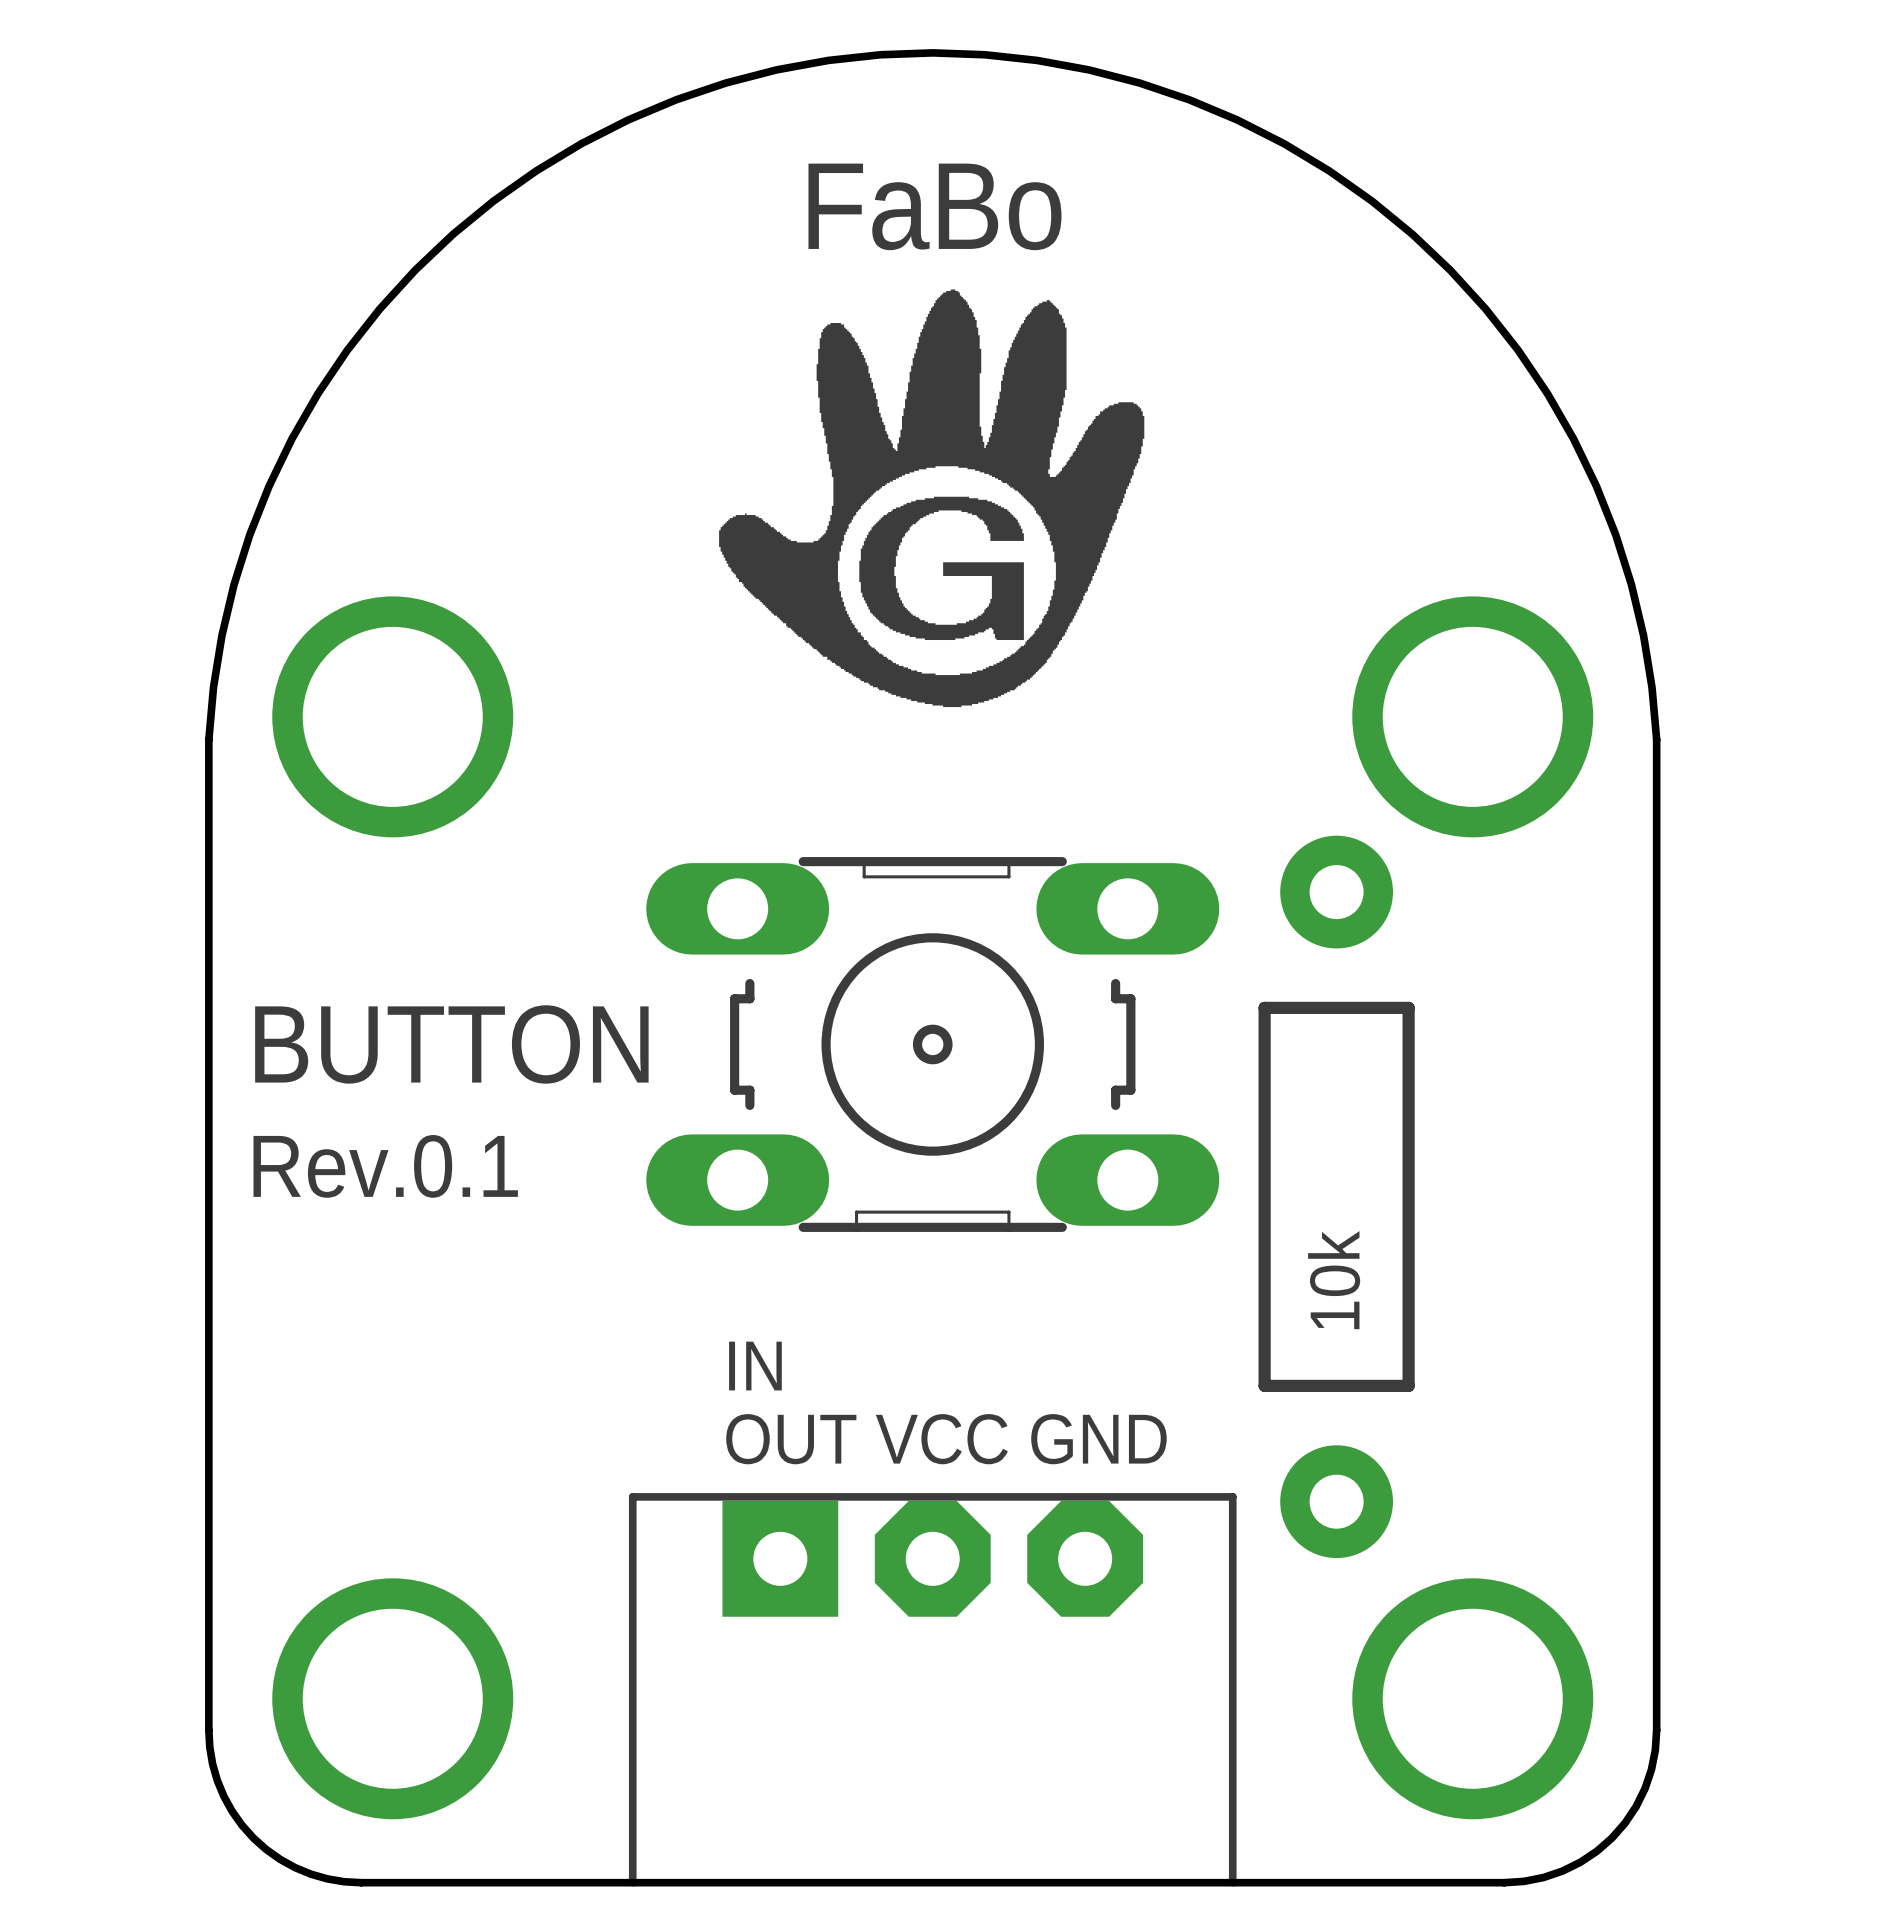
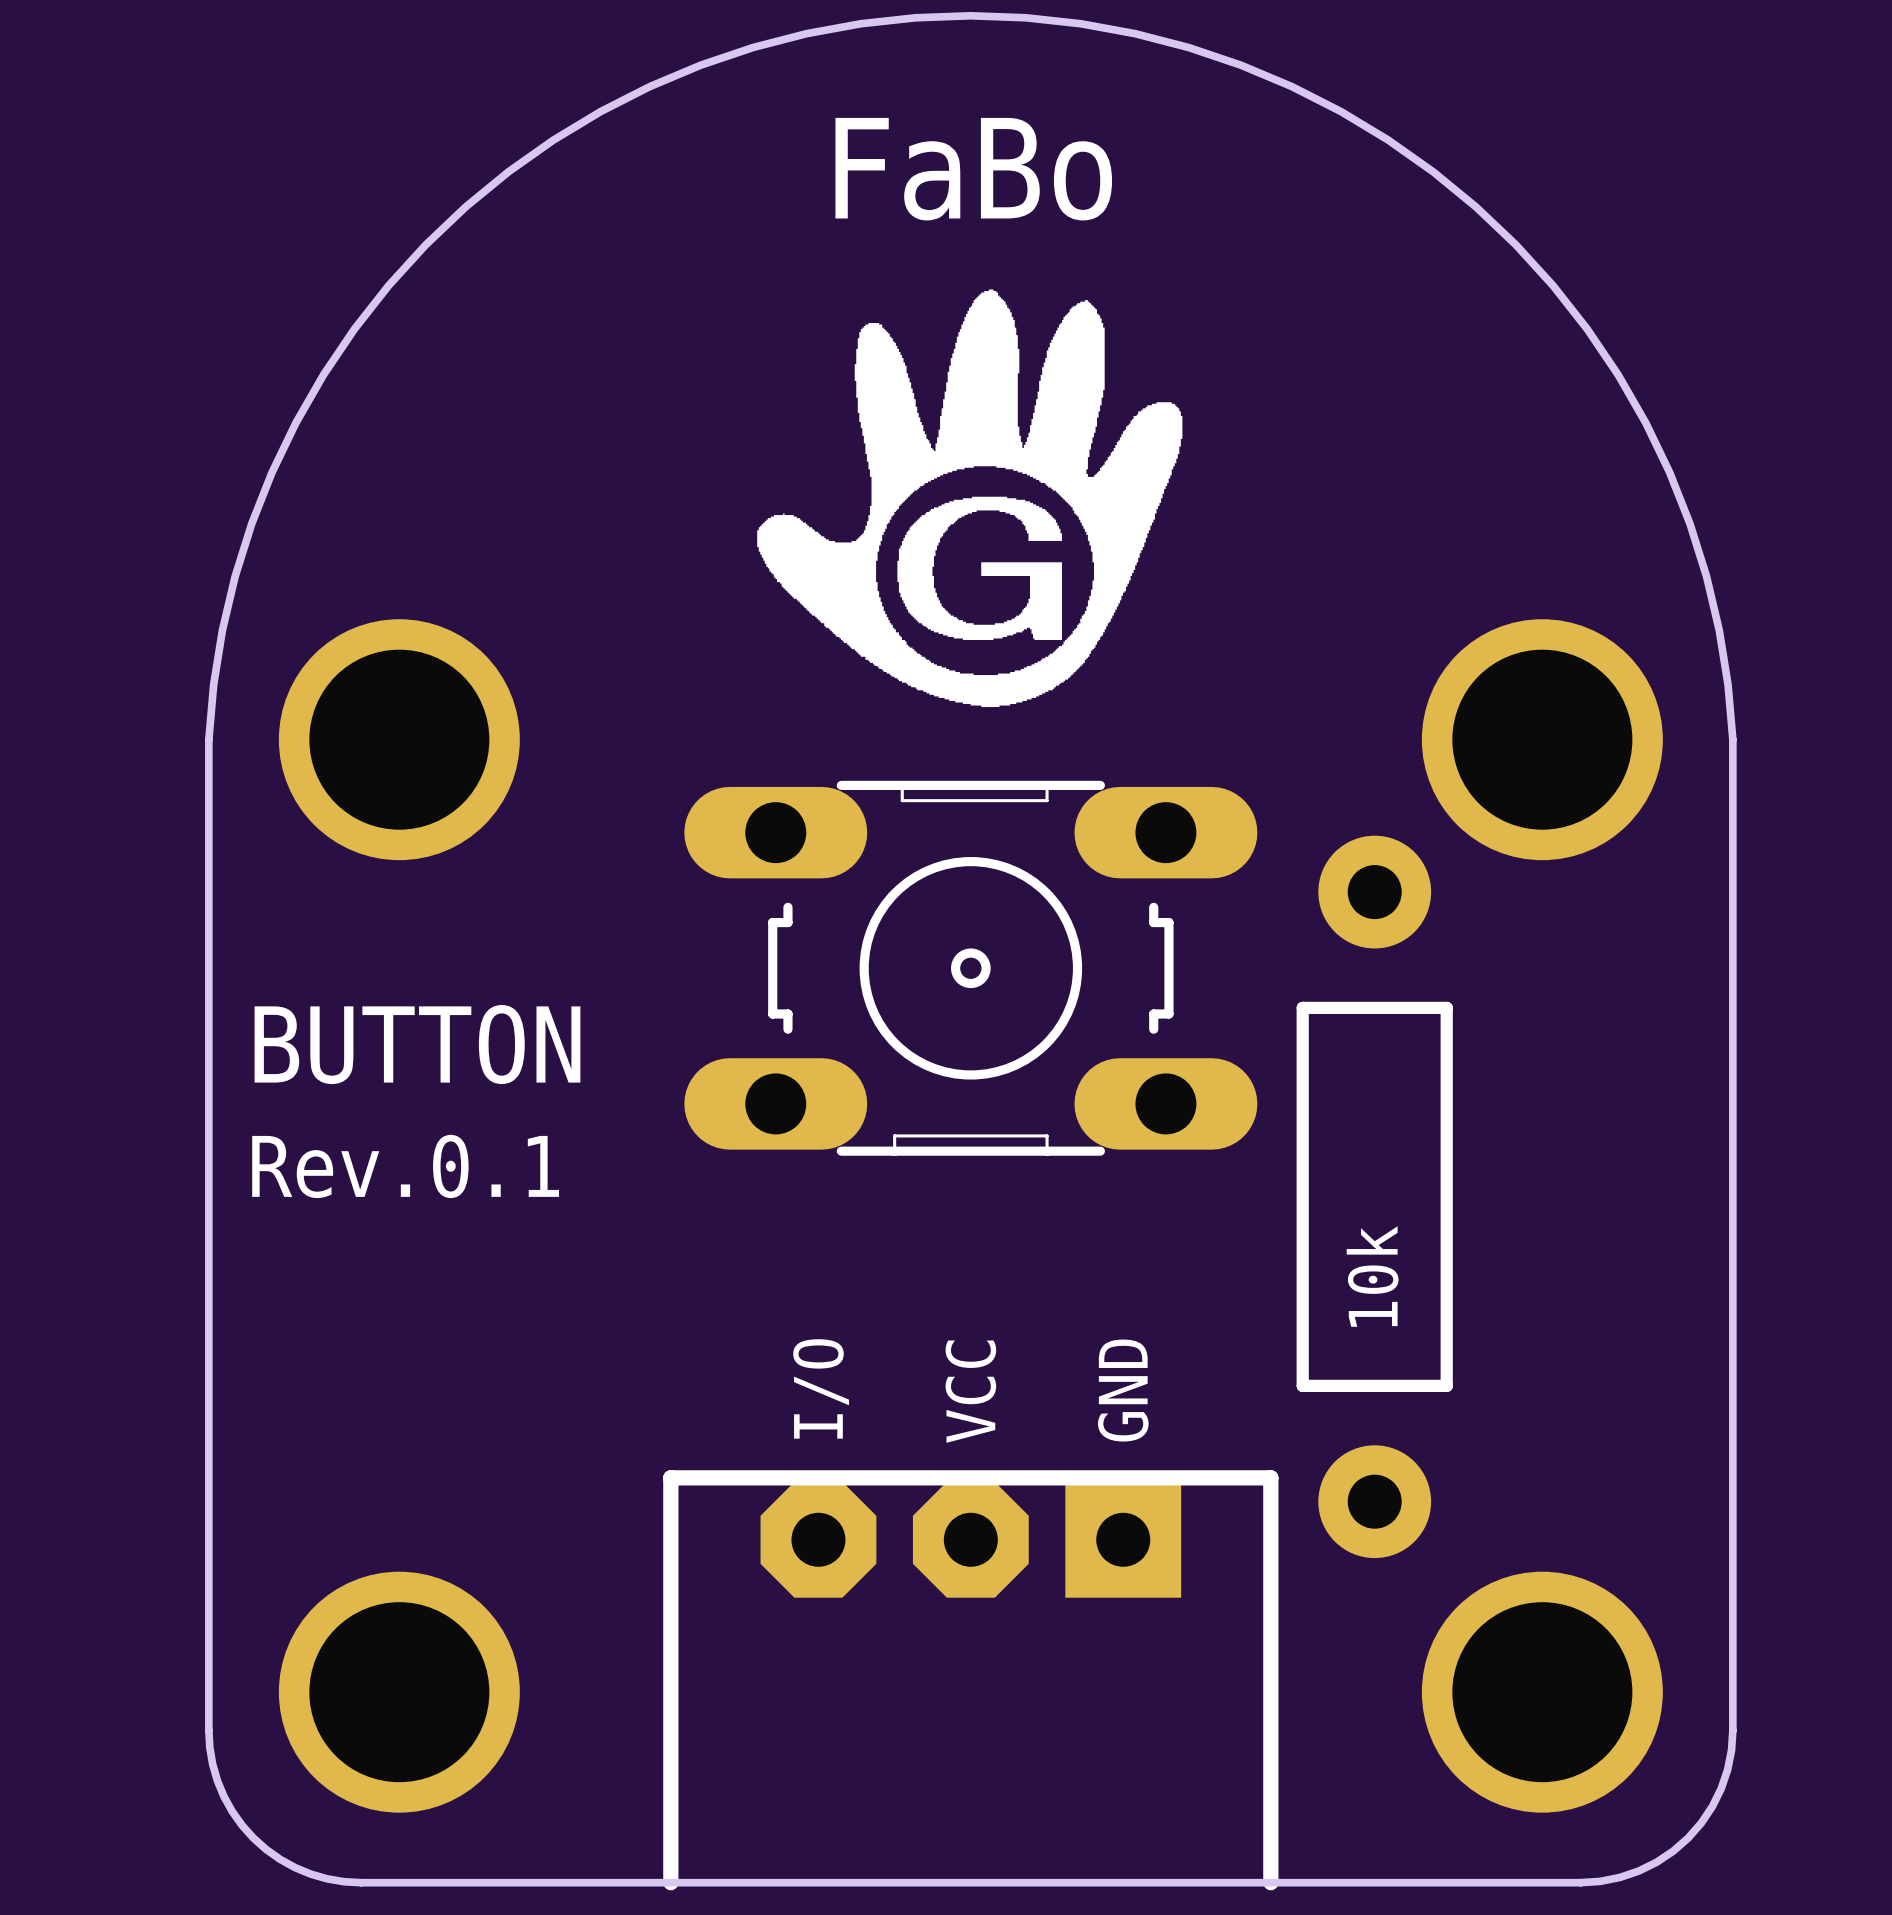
part: none -> (970, 951)
part: (932, 967) -> none
part position: (932, 1044) -> (970, 968)
part position: (1336, 1196) -> (1374, 1196)
text: IN (755, 1366) -> none
text: OUT (791, 1439) -> none
text: VCC (941, 1439) -> none
text: GND (1098, 1439) -> none

